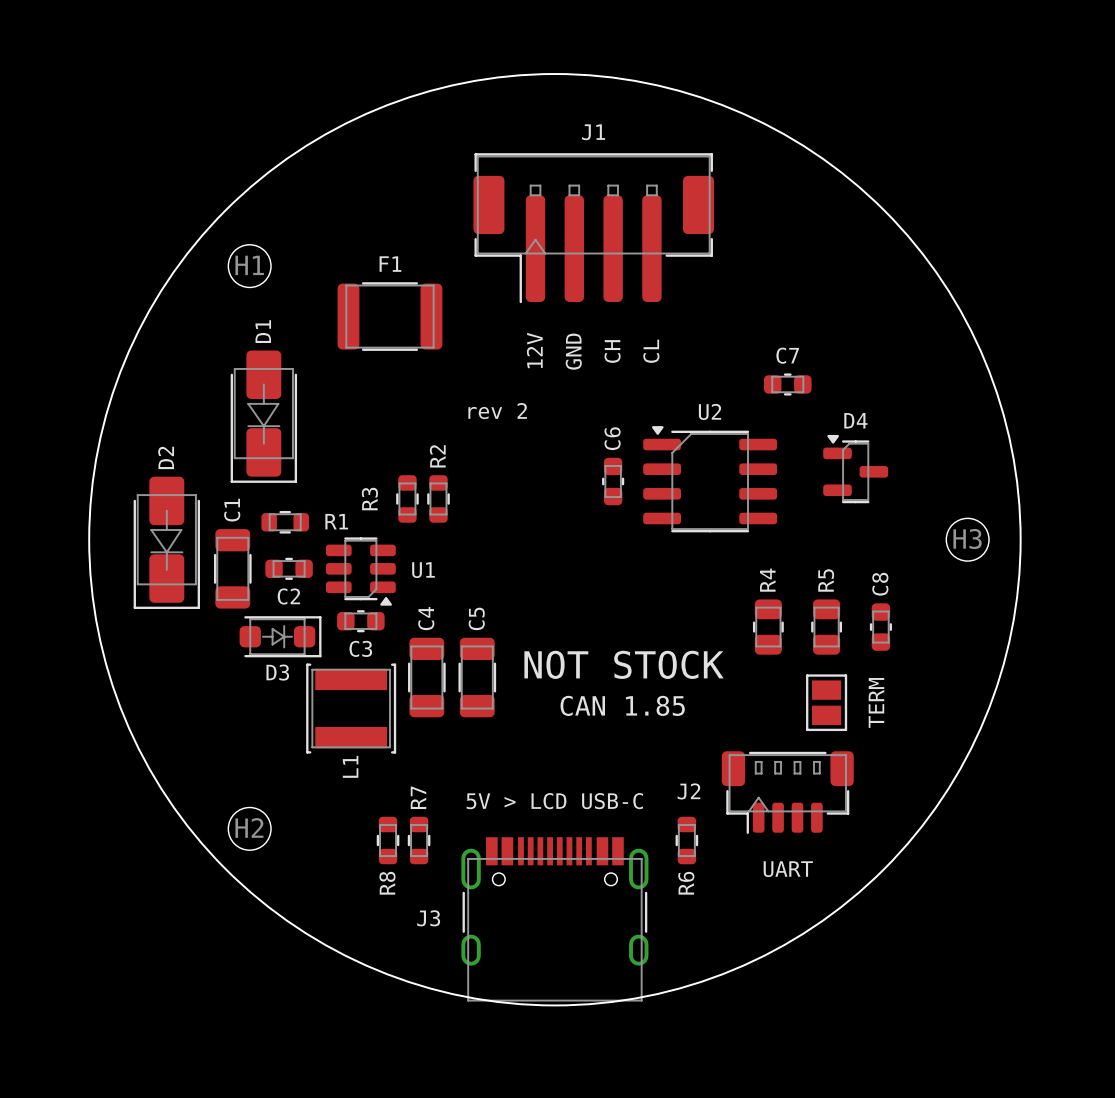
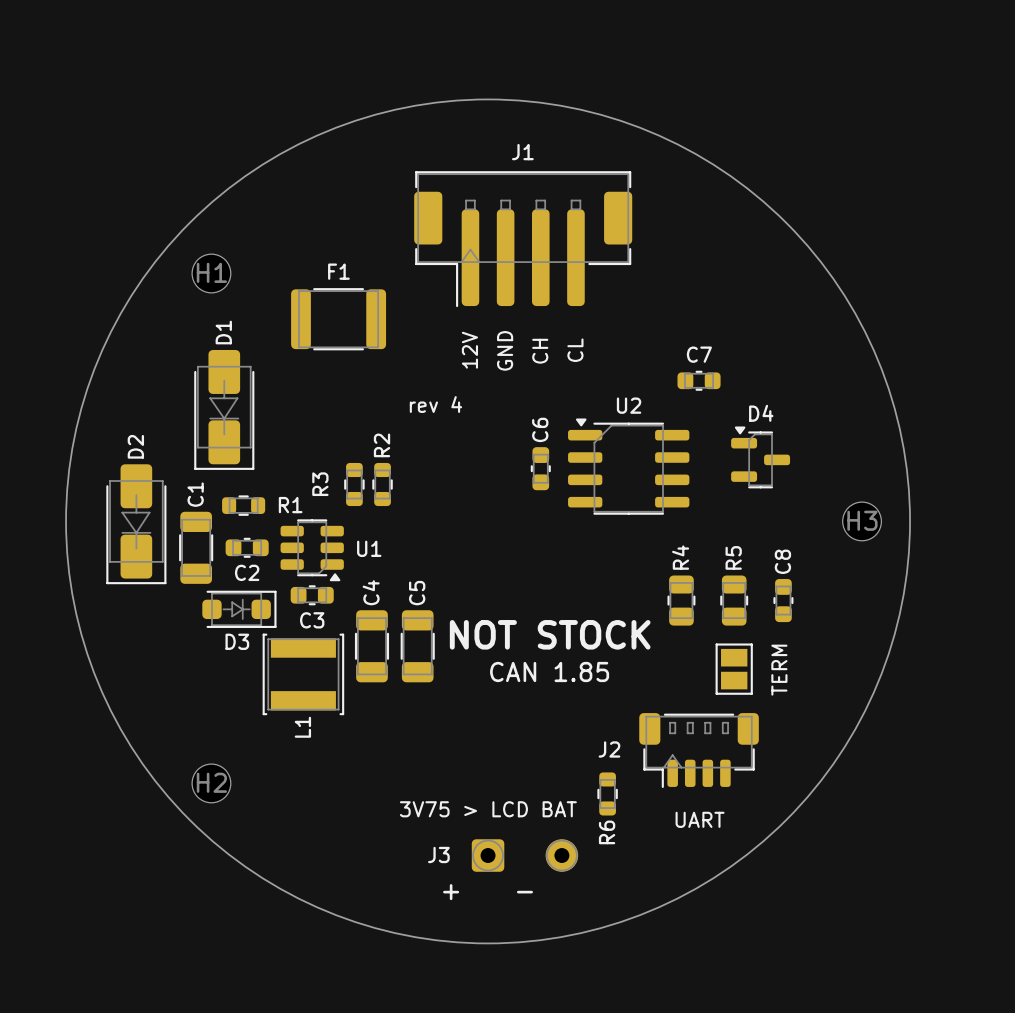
text: rev 2 (497, 411) -> rev 4 (435, 404)
text: 5V > LCD USB-C (554, 801) -> none
J3 footprint: [461, 837, 649, 1002] -> [471, 839, 579, 872]
R8: (388, 840) -> none
R7: (419, 840) -> none
text: none -> 3V75 > LCD BAT (488, 809)
text: none -> + (451, 892)
text: none -> - (524, 892)

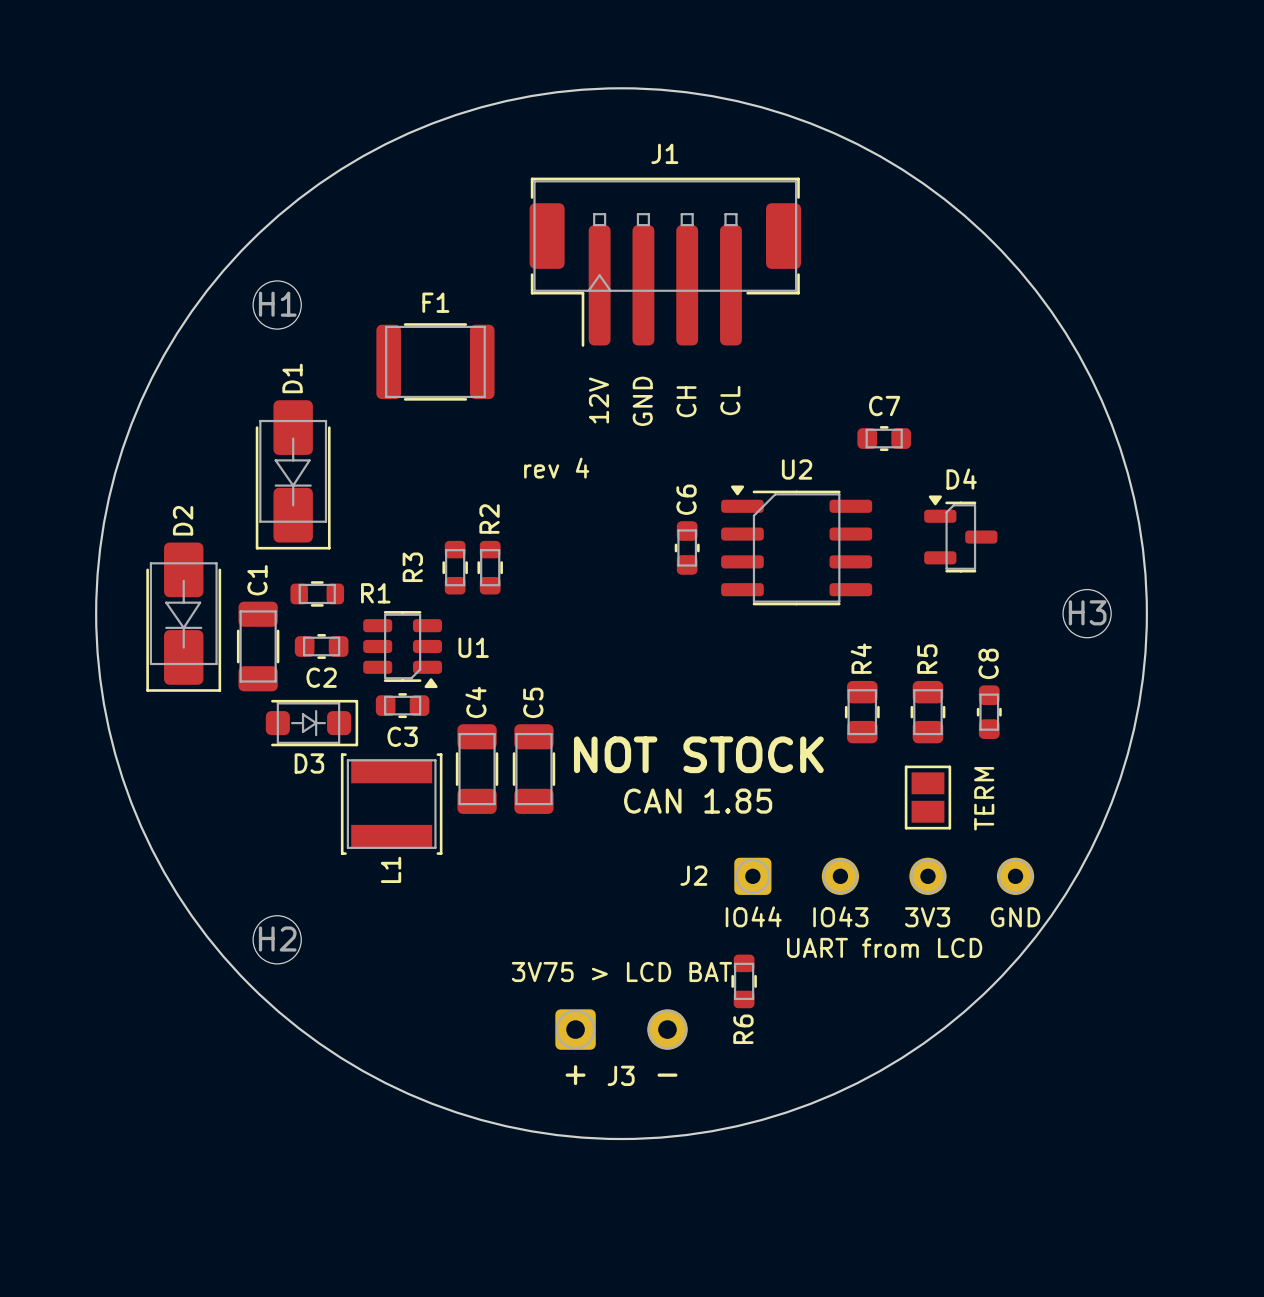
J2 footprint: [639, 713, 759, 789] -> [734, 857, 1035, 895]
J2 name position: J2 (609, 749) -> J2 (693, 875)
text: none -> IO44 (753, 916)
text: none -> IO43 (840, 916)
text: none -> 3V3 (927, 917)
text: none -> GND (1015, 917)
text: none -> UART from LCD (884, 947)
R6 position: (607, 793) -> (744, 981)
text: UART (700, 819) -> none
J3 name position: J3 (438, 854) -> J3 (621, 1075)
J3 position: (524, 855) -> (621, 1029)

